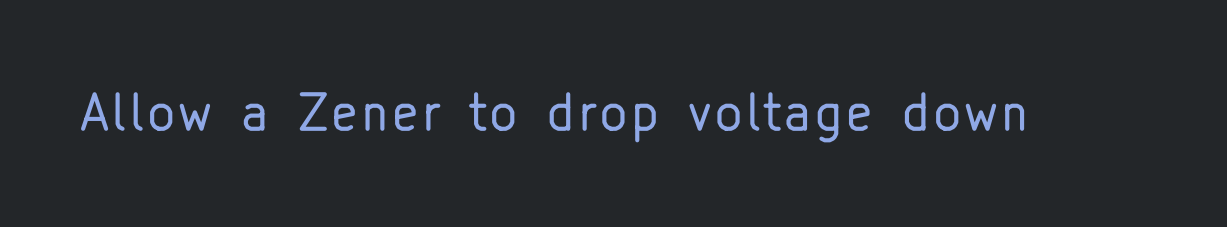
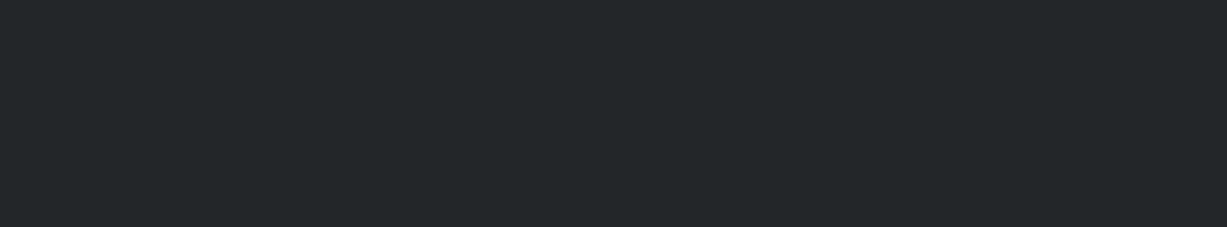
text: Allow a Zener to drop voltage down (552, 117) -> none

